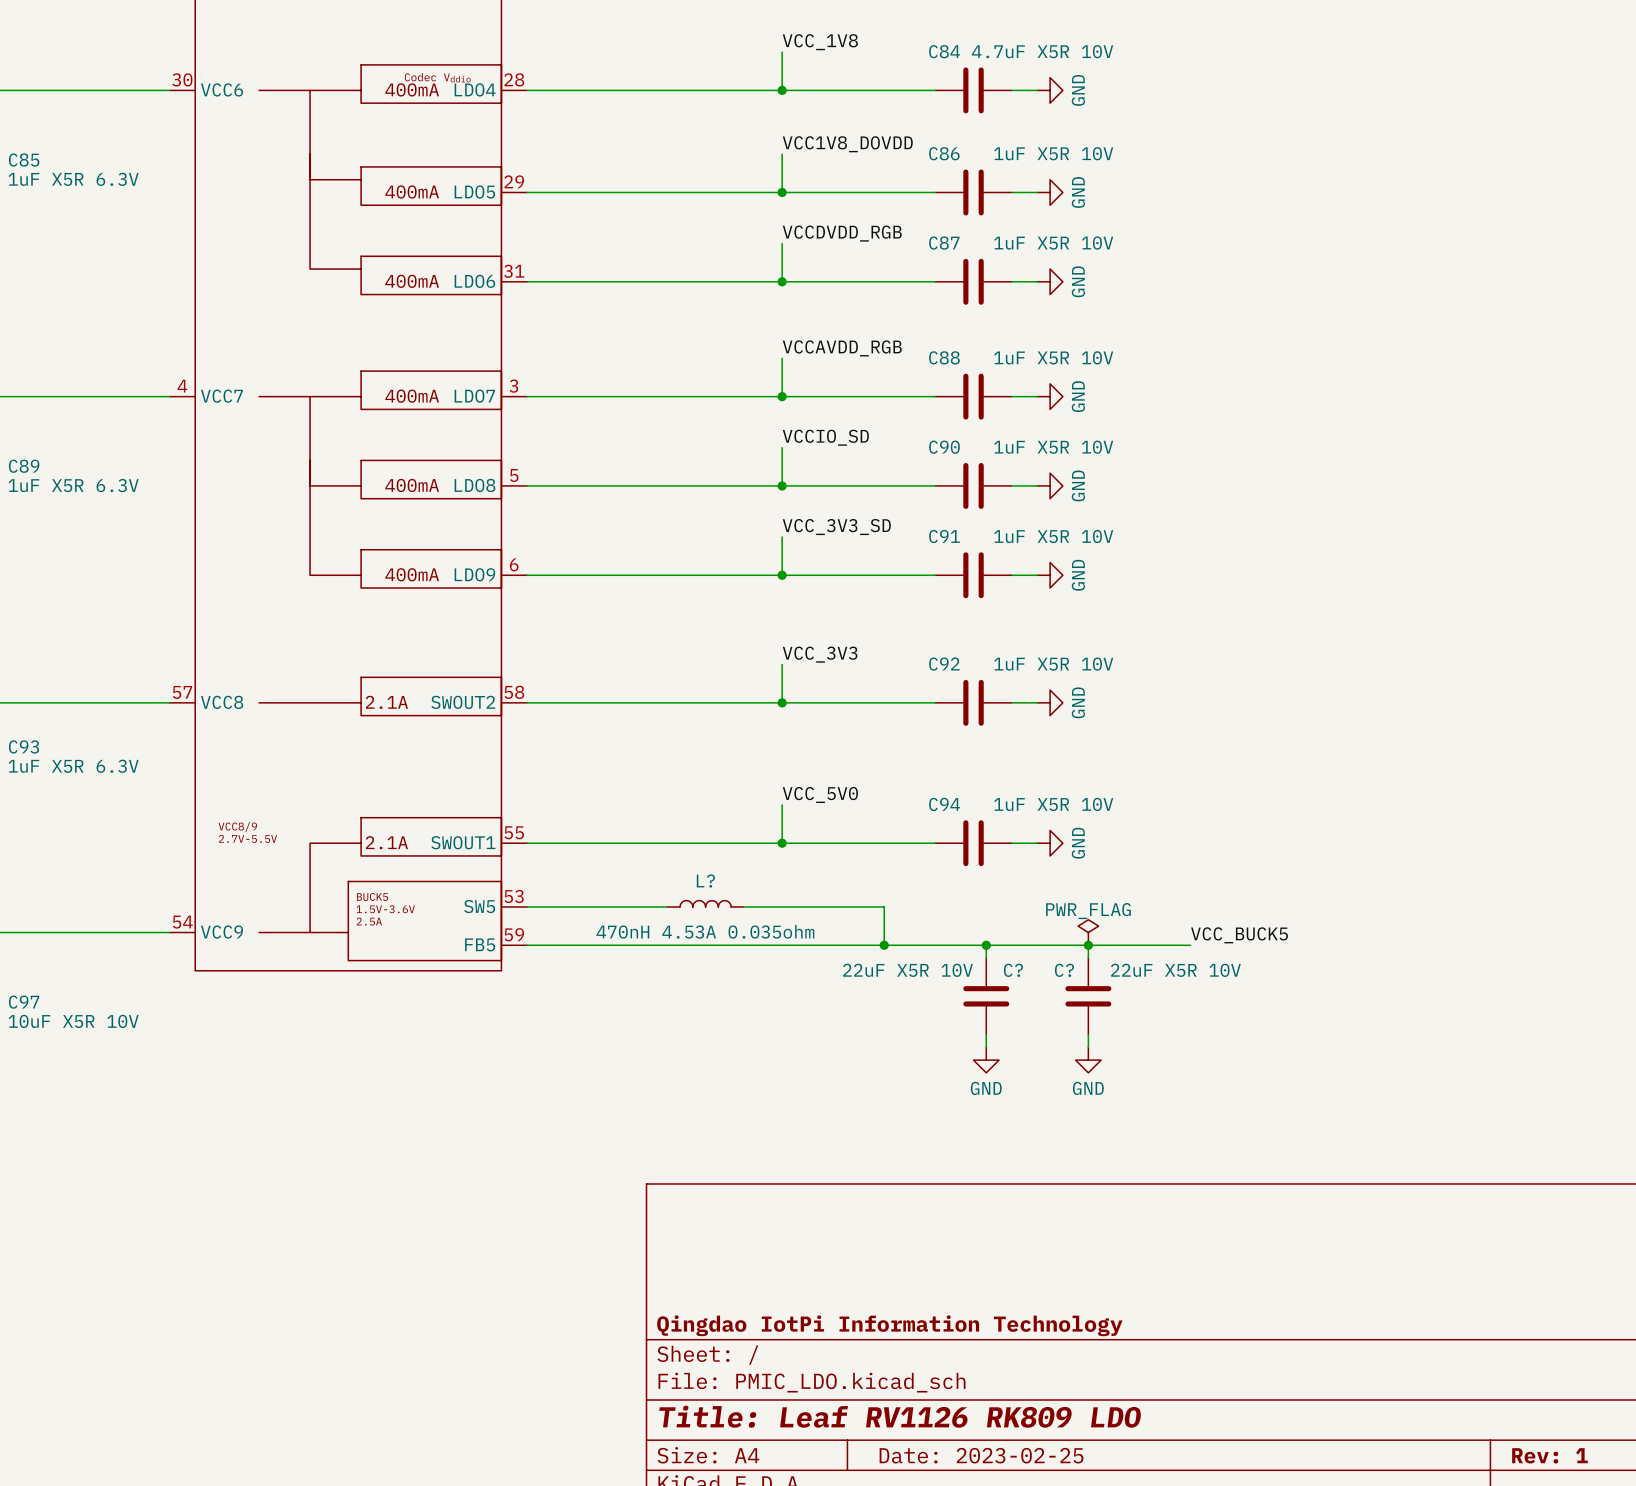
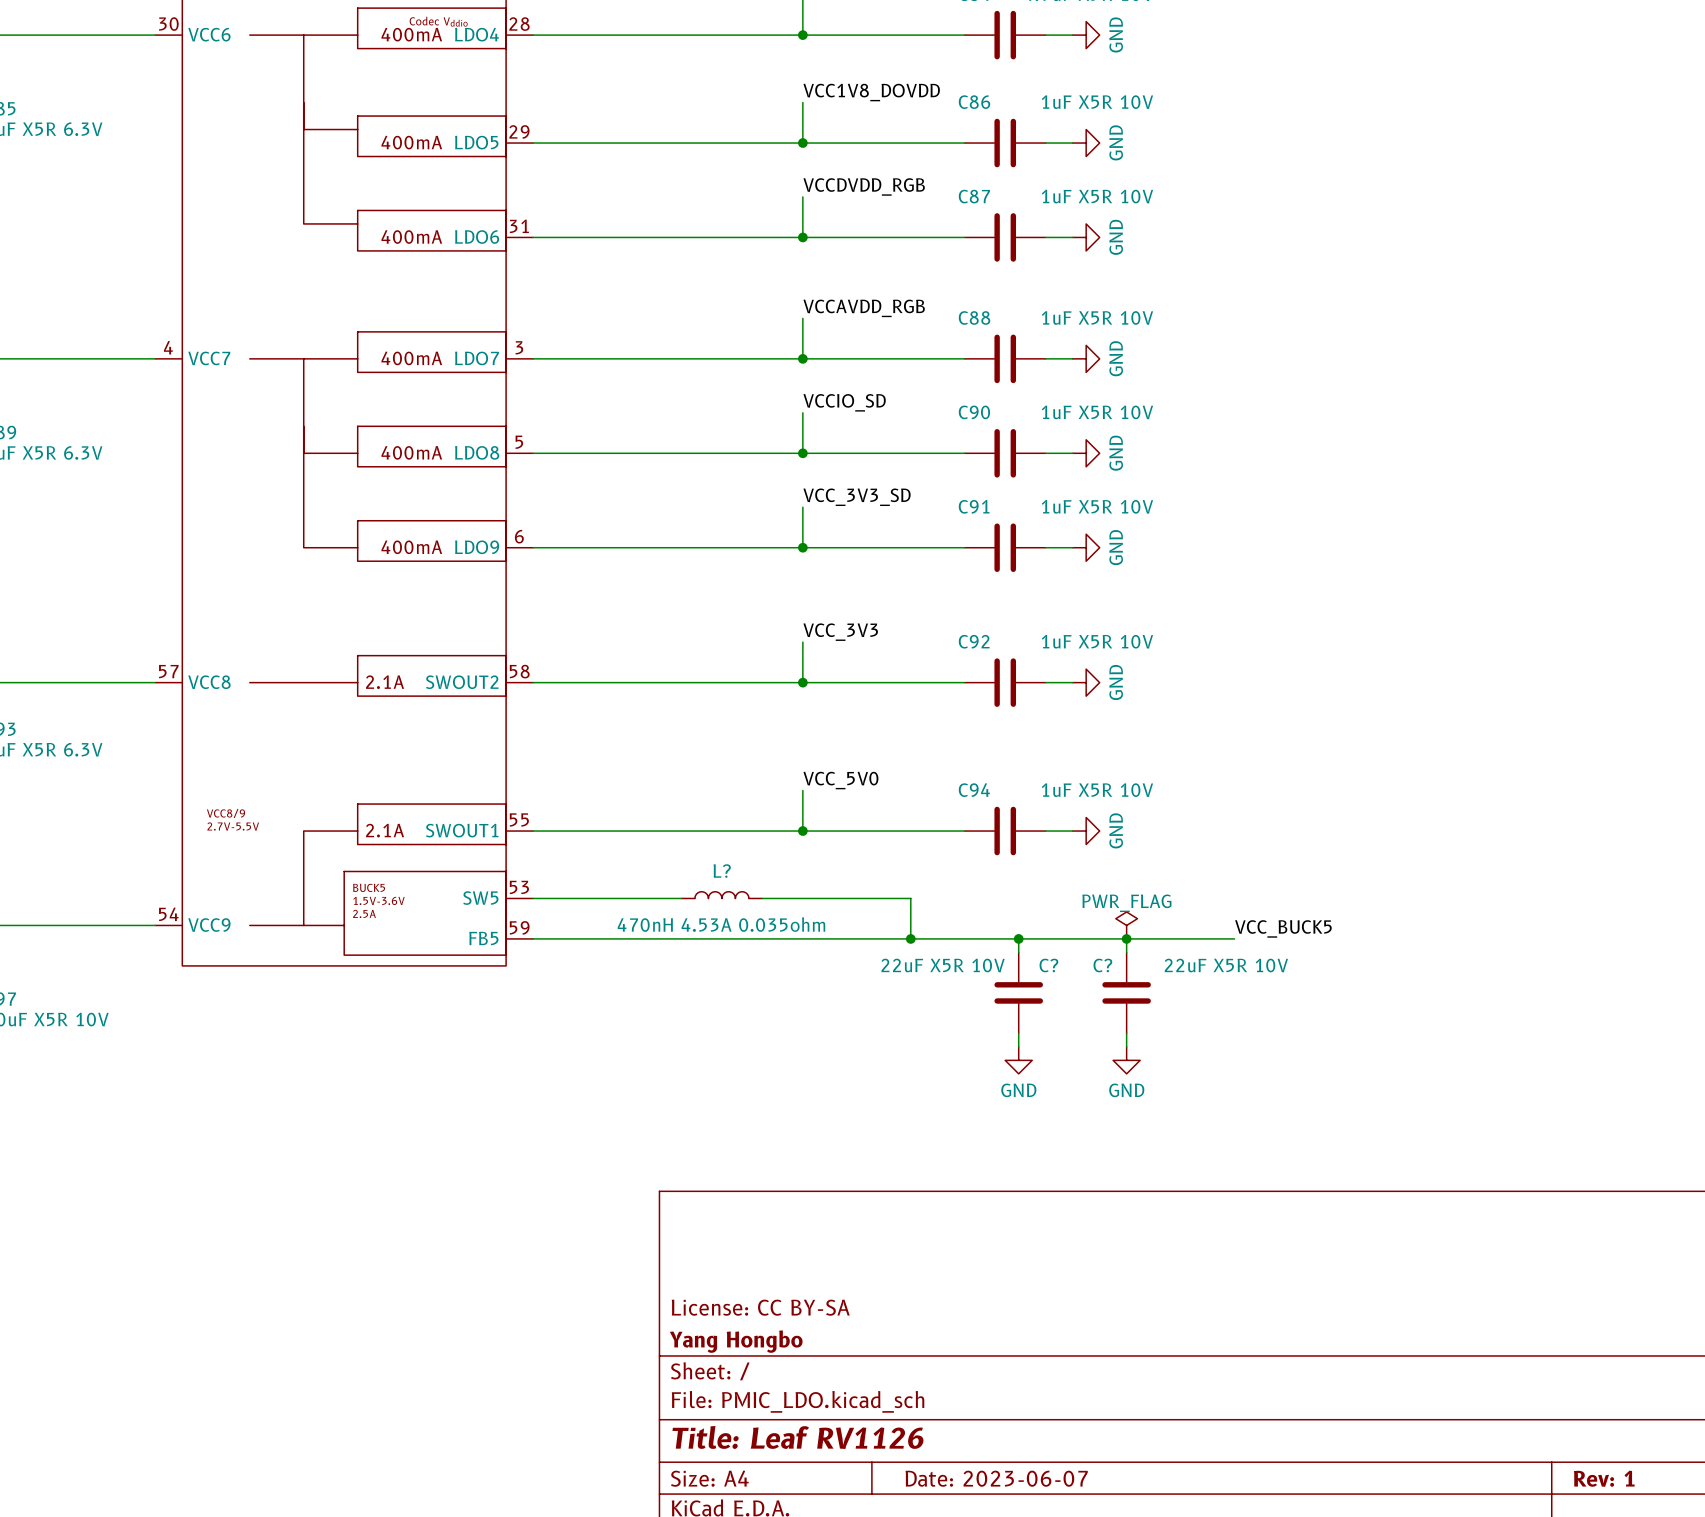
title block: none -> License: CC BY-SA (760, 1307)
title block: Qingdao IotPi Information Technology (889, 1325) -> Yang Hongbo (736, 1341)
title block: Title: Leaf RV1126 RK809 LDO (900, 1416) -> Title: Leaf RV1126 (798, 1437)
title block: Date: 2023-02-25 (981, 1455) -> Date: 2023-06-07 (996, 1478)

